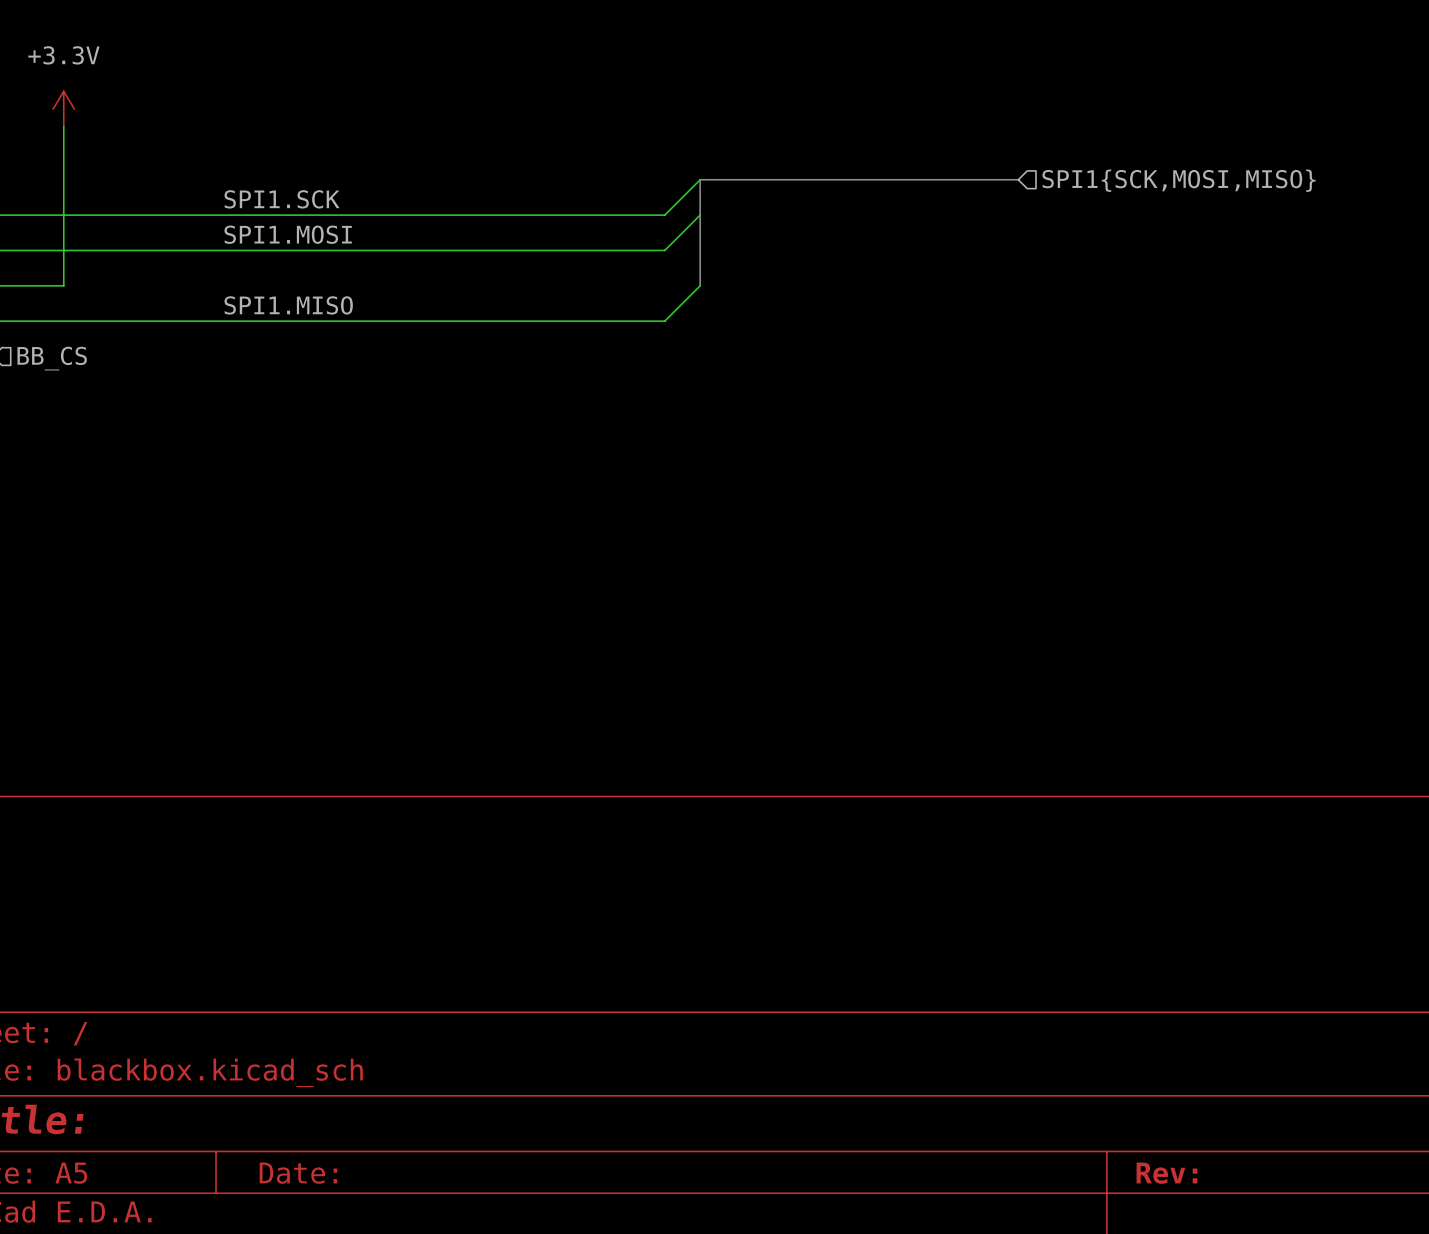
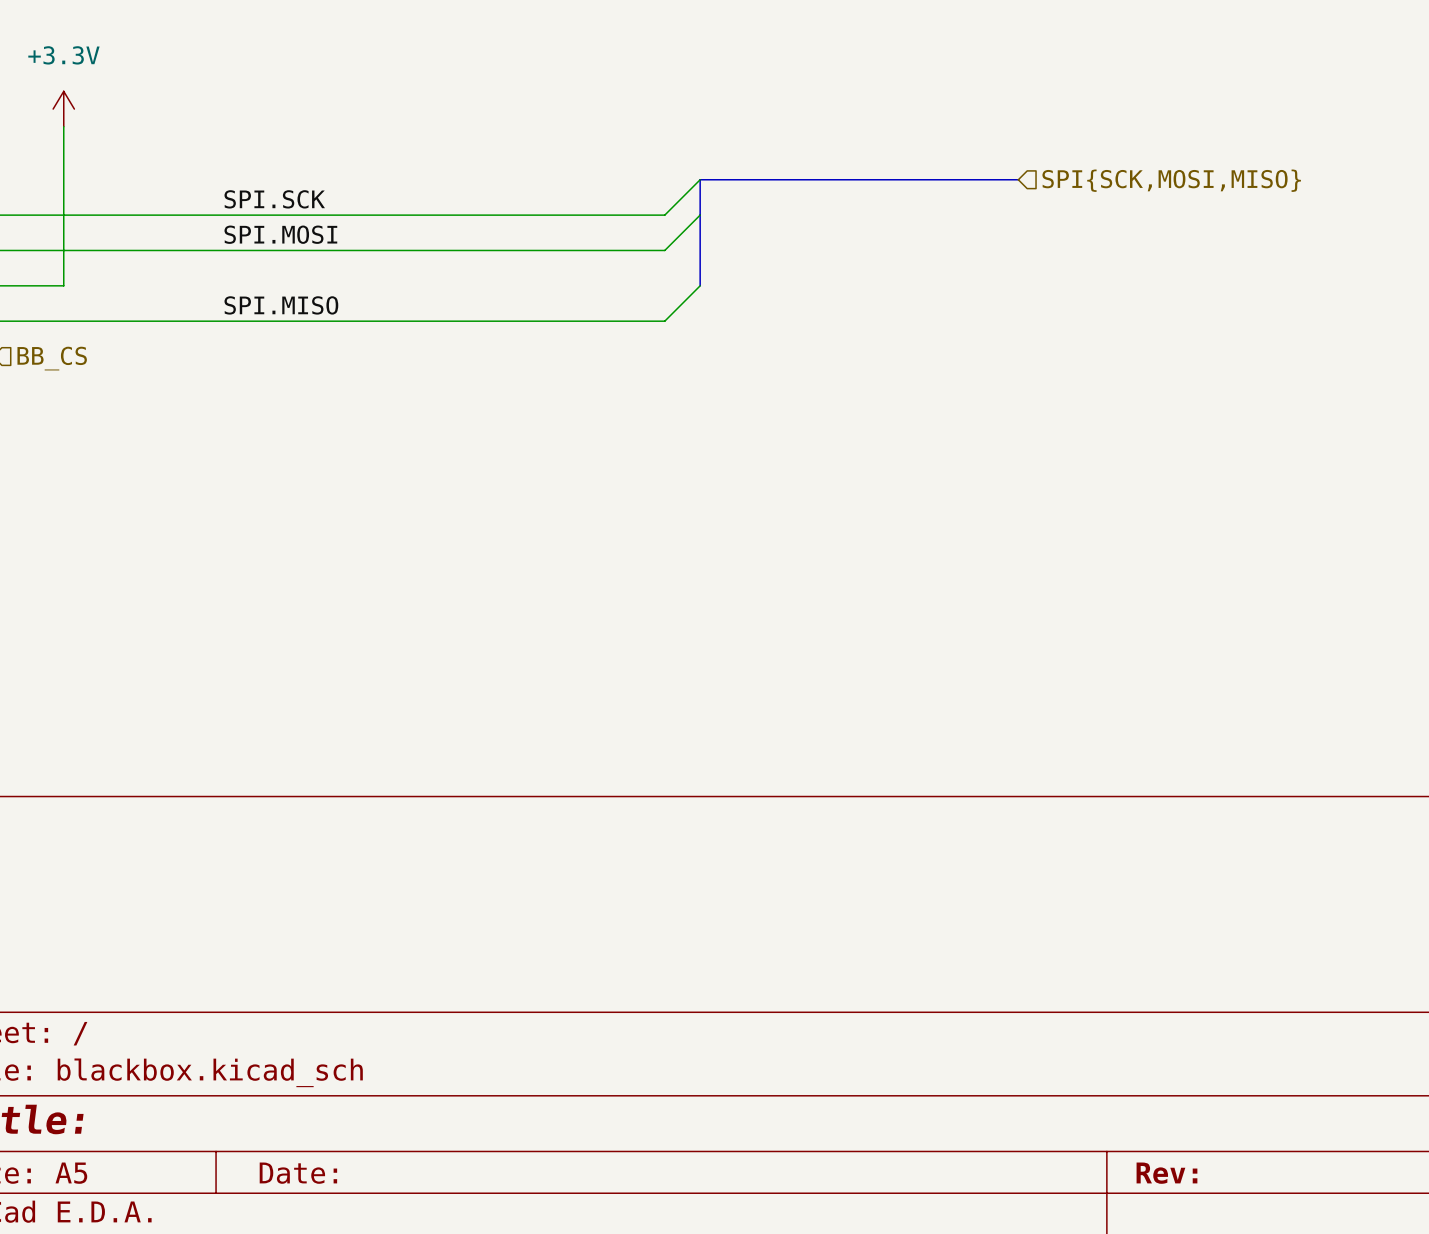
hierarchical label: SPI1{SCK,MOSI,MISO} (1178, 180) -> SPI{SCK,MOSI,MISO} (1171, 180)
label: SPI1.SCK (282, 199) -> SPI.SCK (274, 199)
label: SPI1.MOSI (288, 234) -> SPI.MOSI (280, 234)
label: SPI1.MISO (288, 305) -> SPI.MISO (281, 305)

